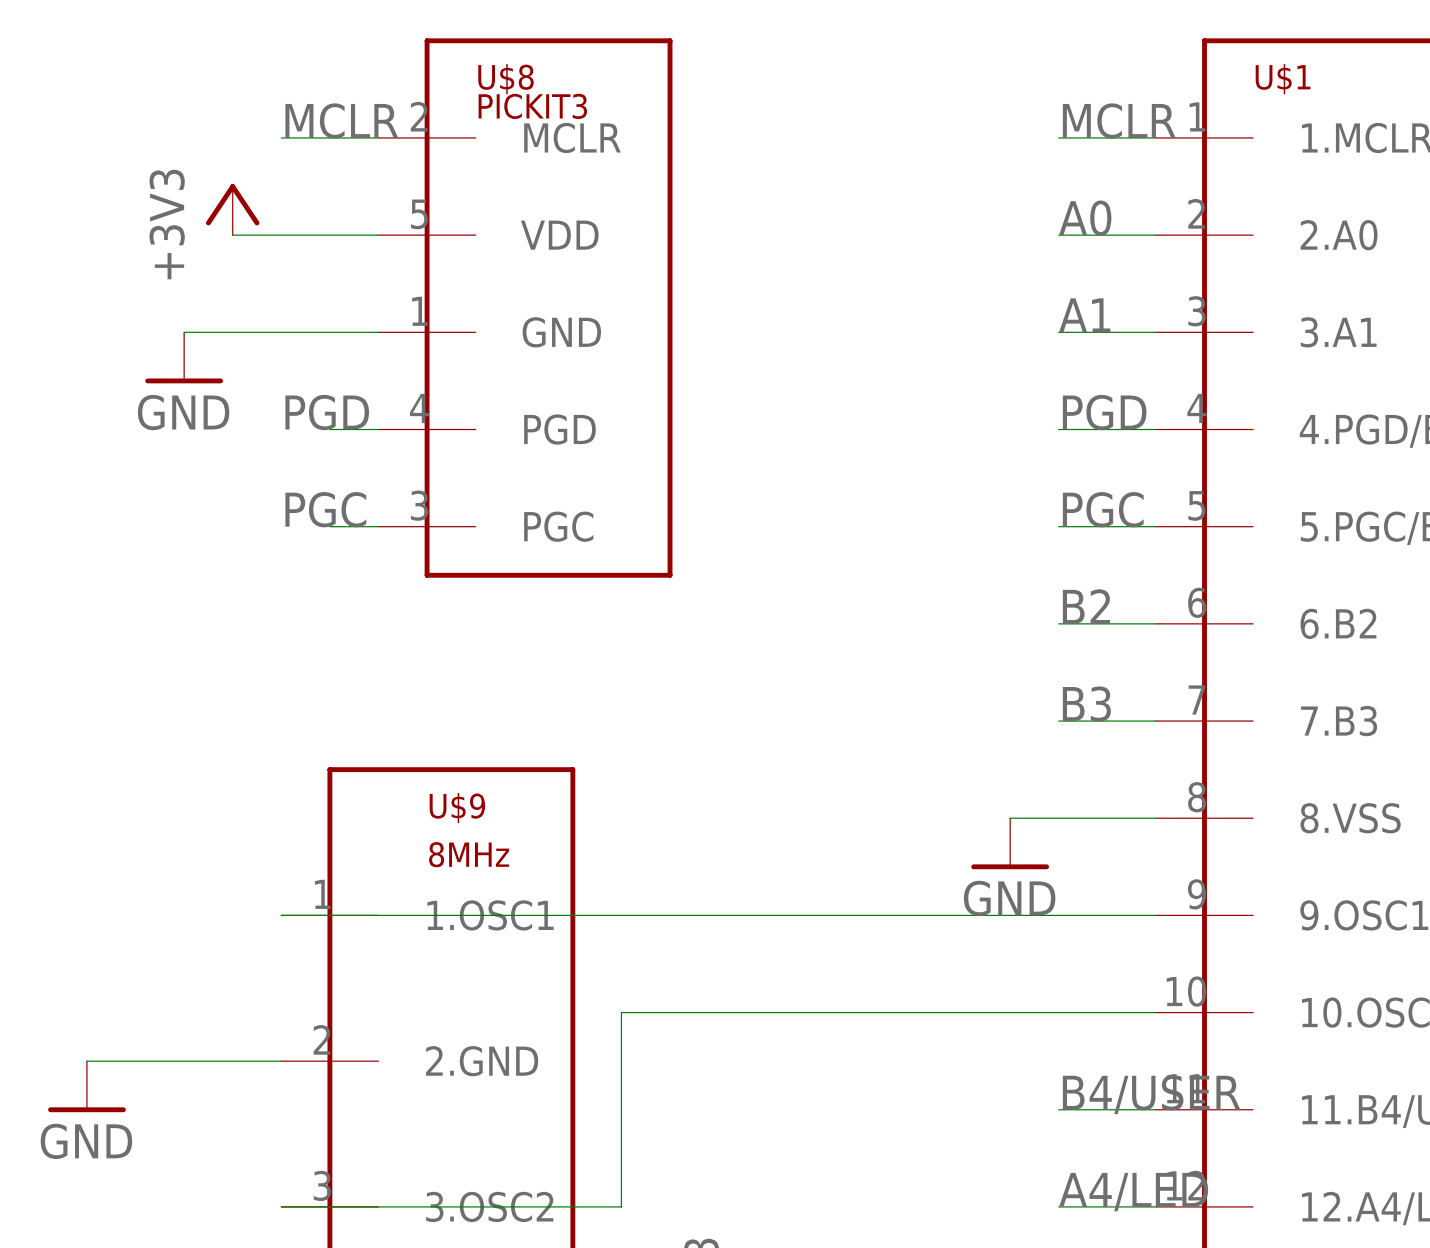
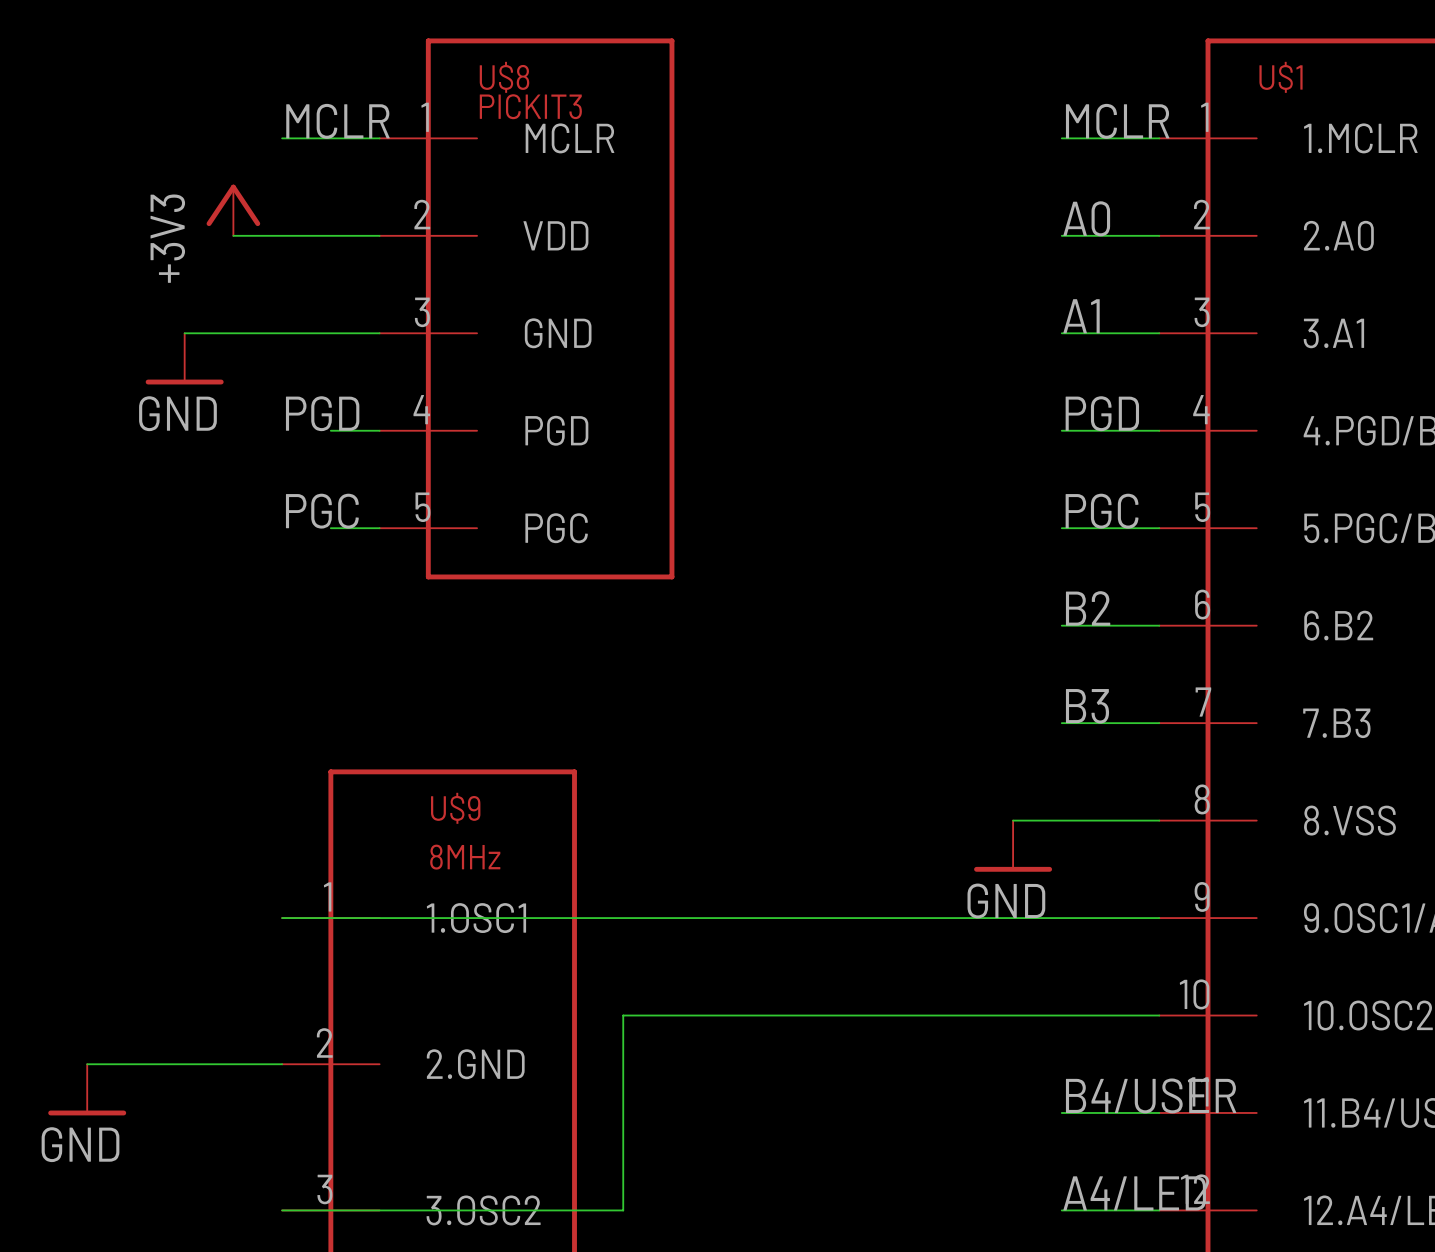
U$8 pin number: 2 (419, 116) -> 1 (425, 117)
U$8 pin number: 5 (419, 214) -> 2 (422, 214)
U$8 pin number: 1 (419, 311) -> 3 (422, 312)
U$8 pin number: 3 (419, 505) -> 5 (422, 507)

